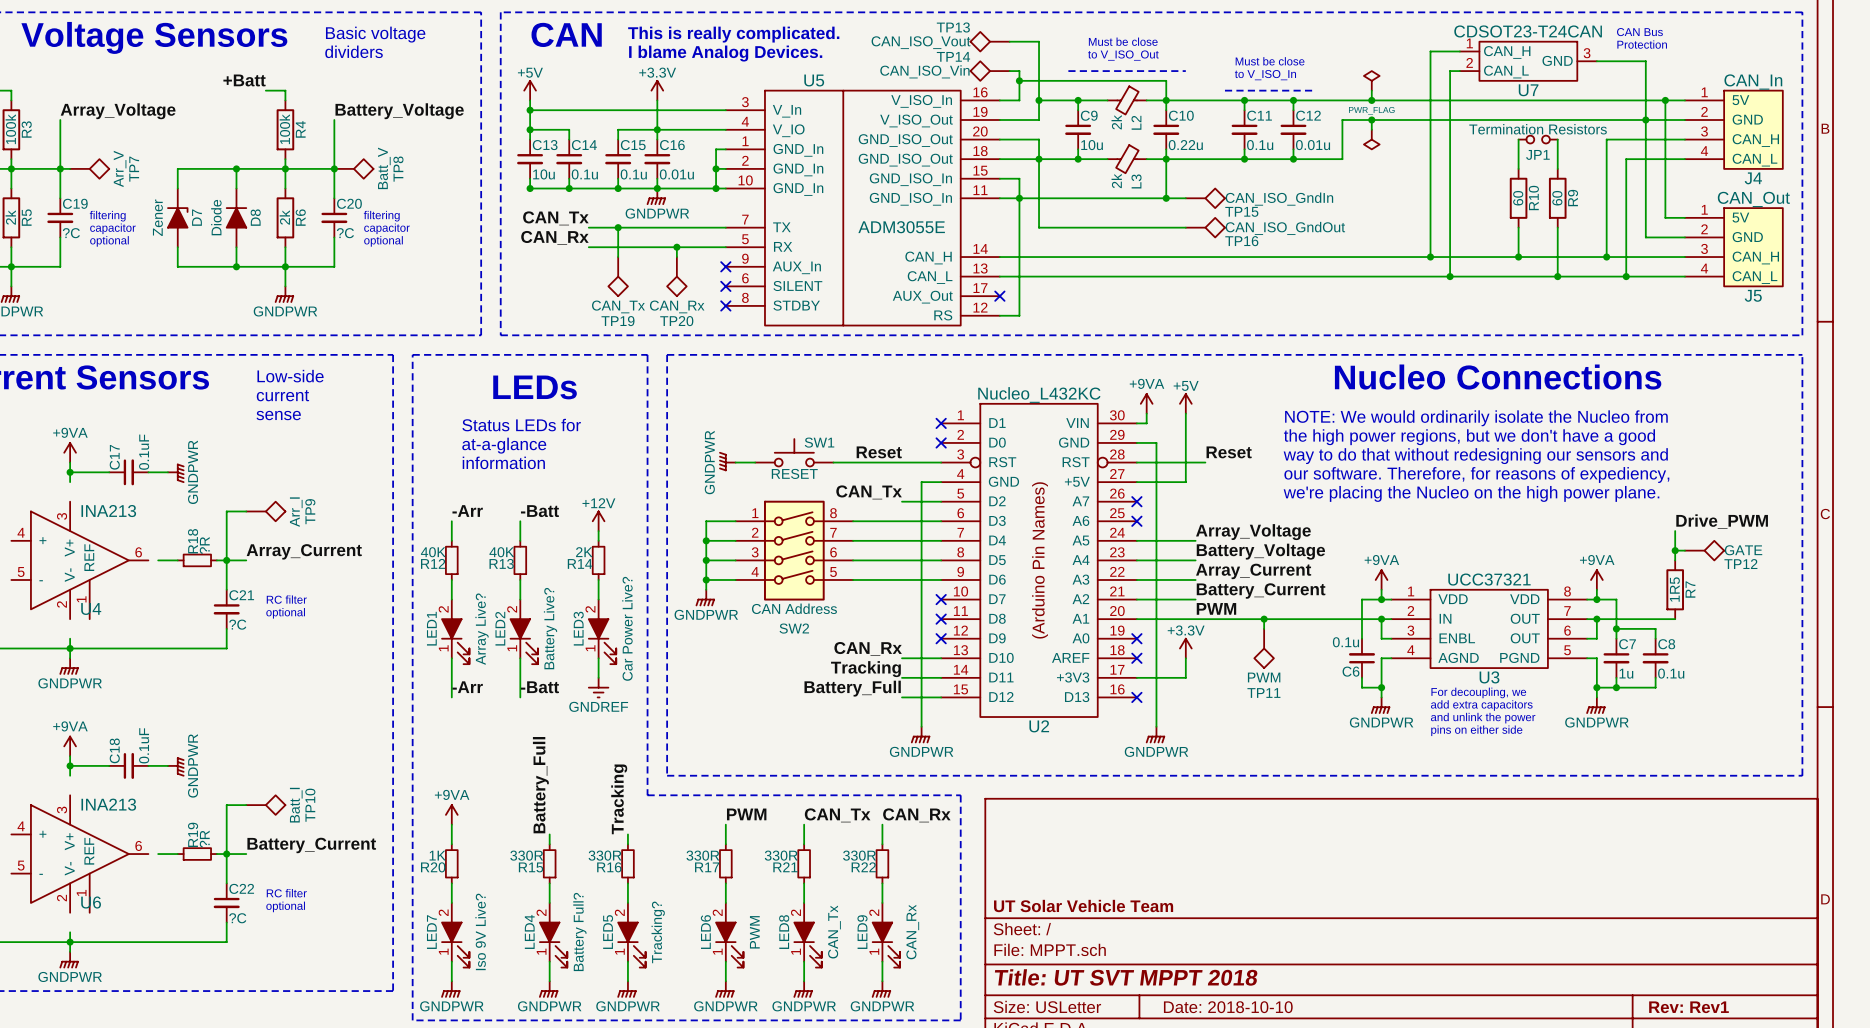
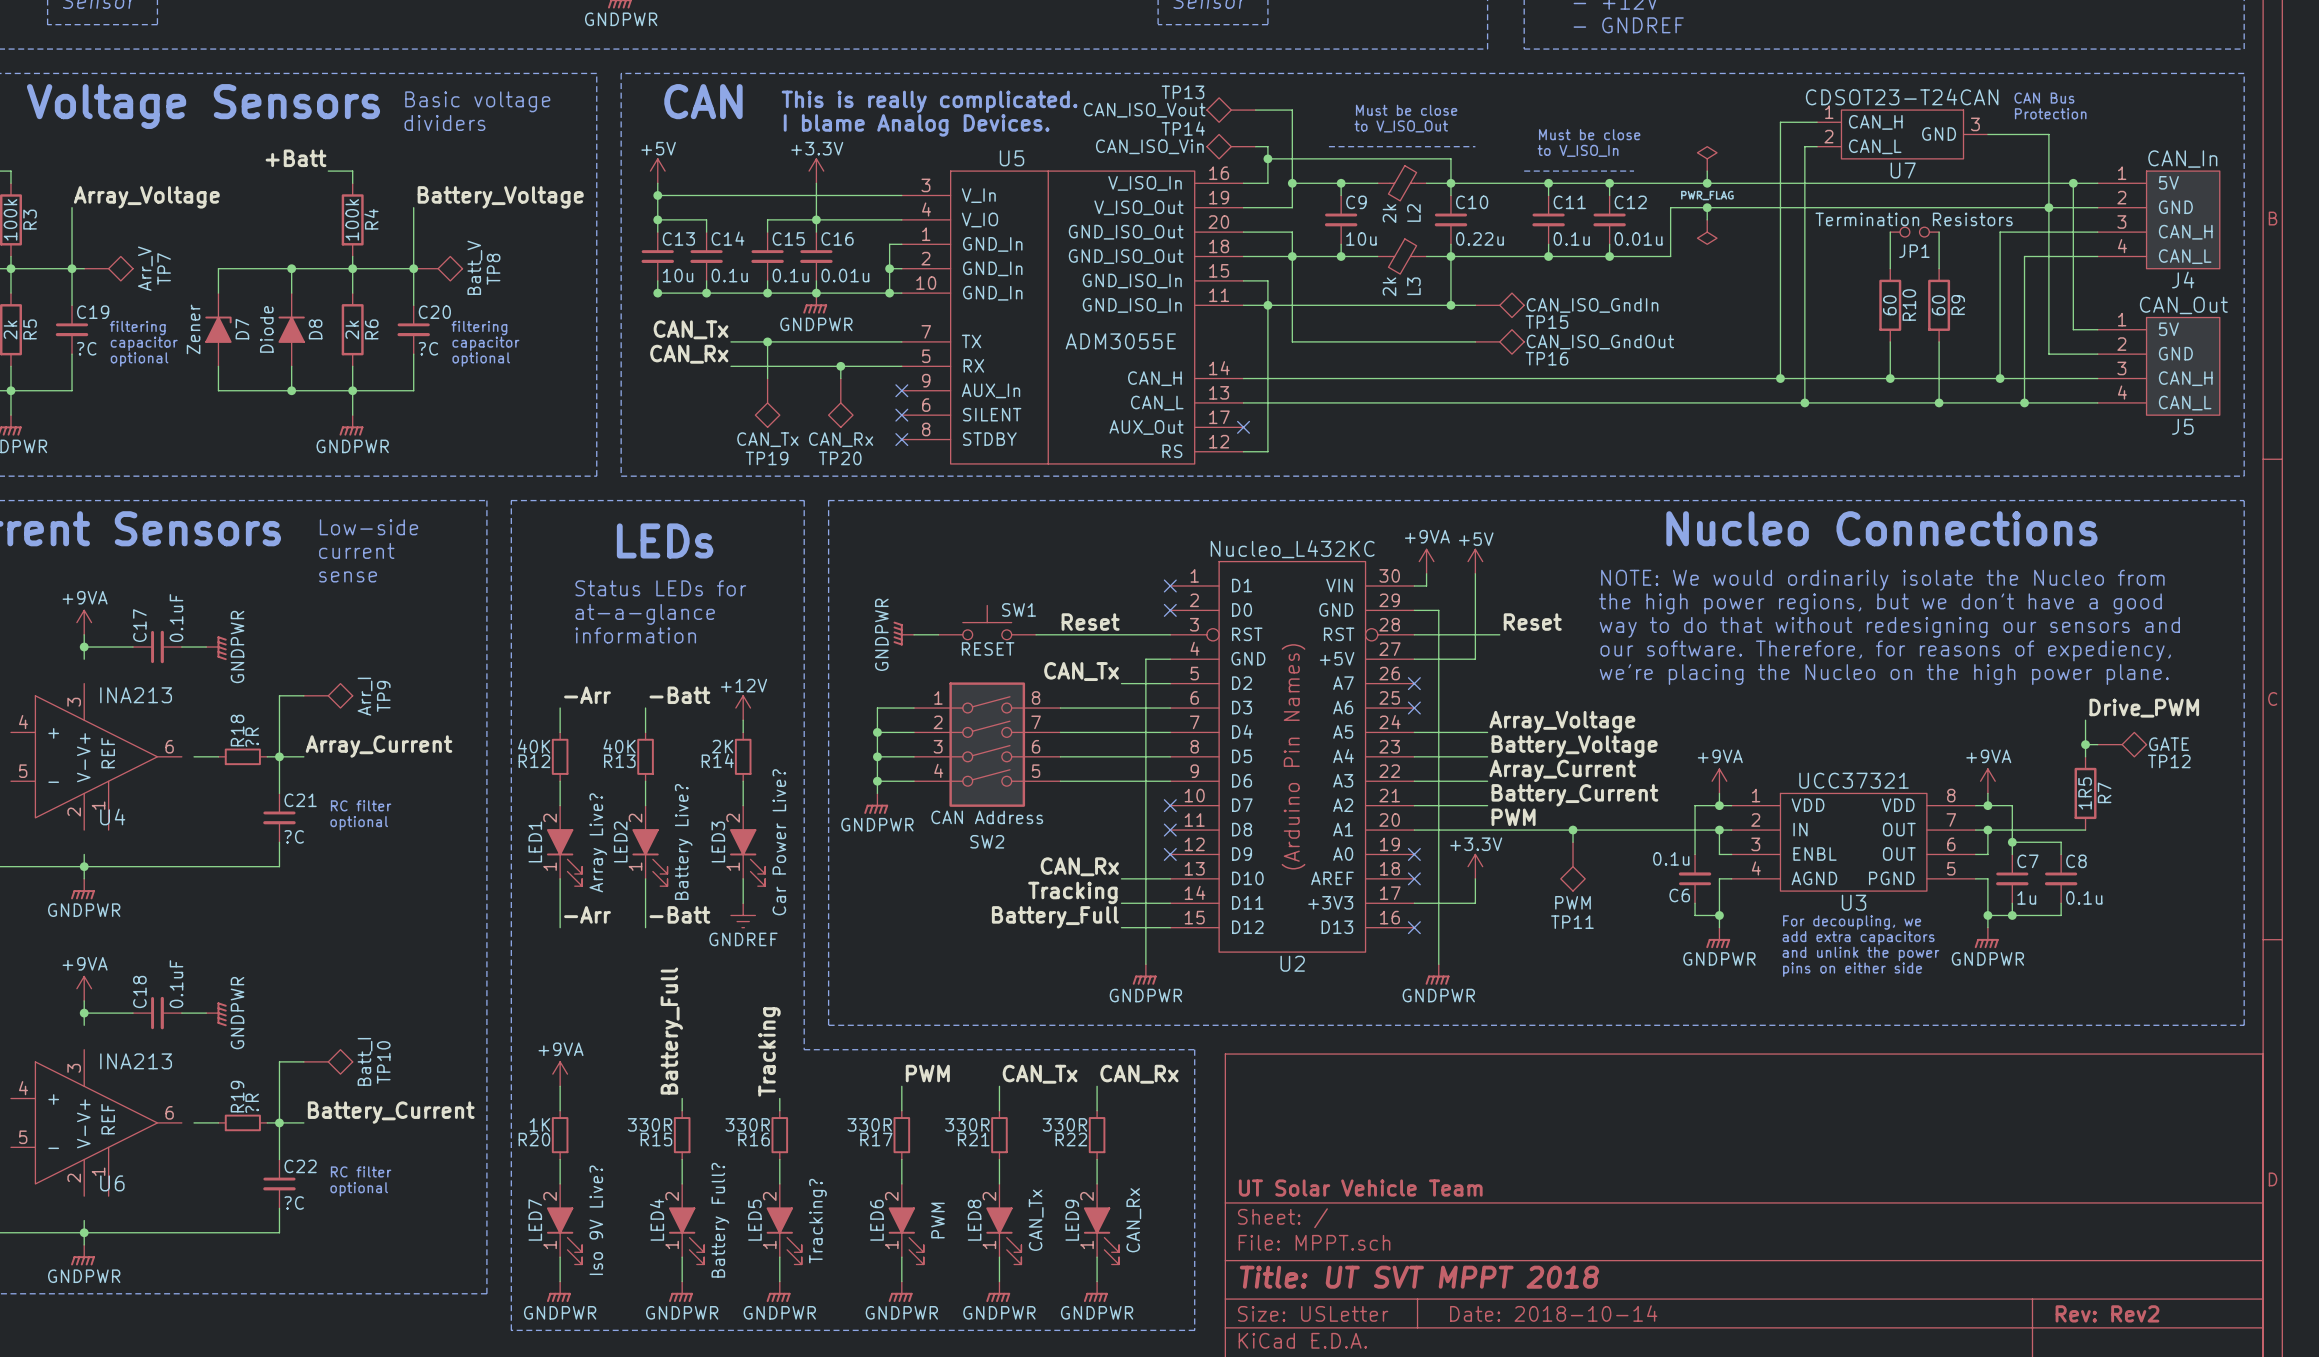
title block: Date: 2018-10-10 (1228, 1007) -> Date: 2018-10-14 (1553, 1313)
title block: Rev: Rev1 (1689, 1007) -> Rev: Rev2 (2107, 1313)

